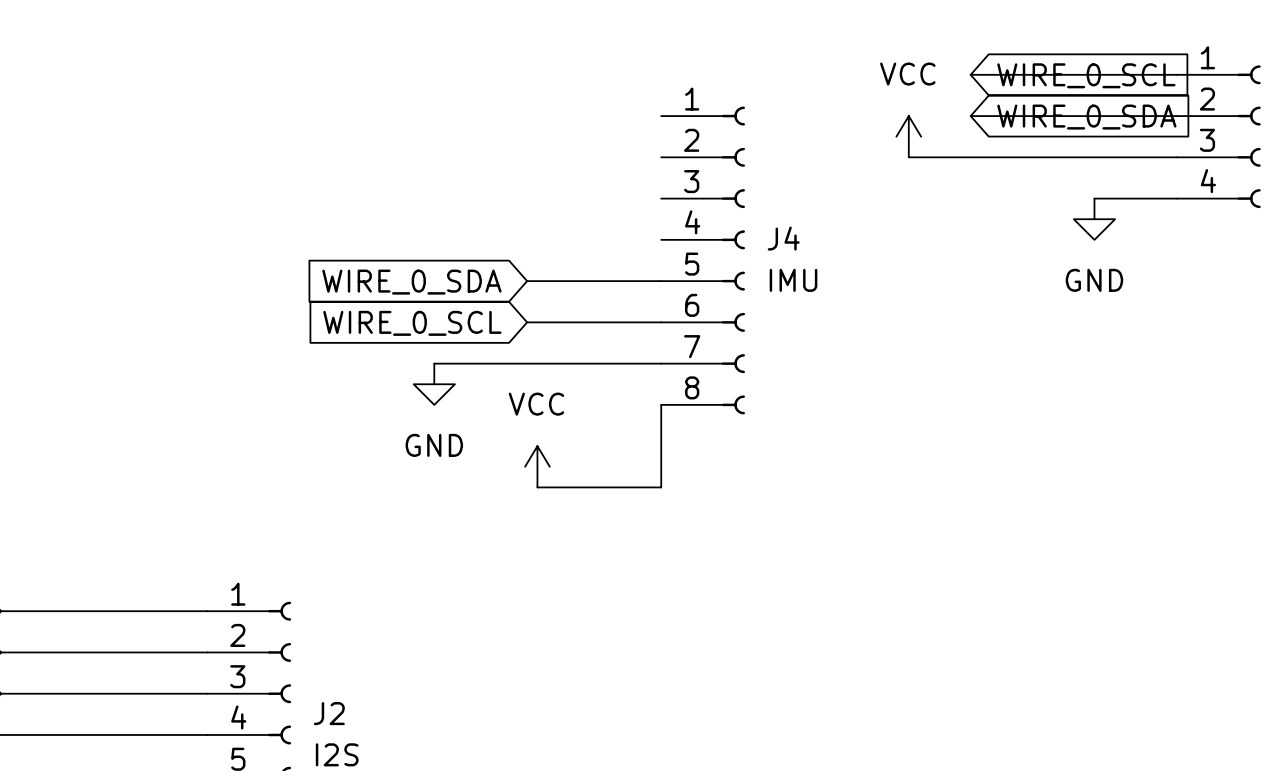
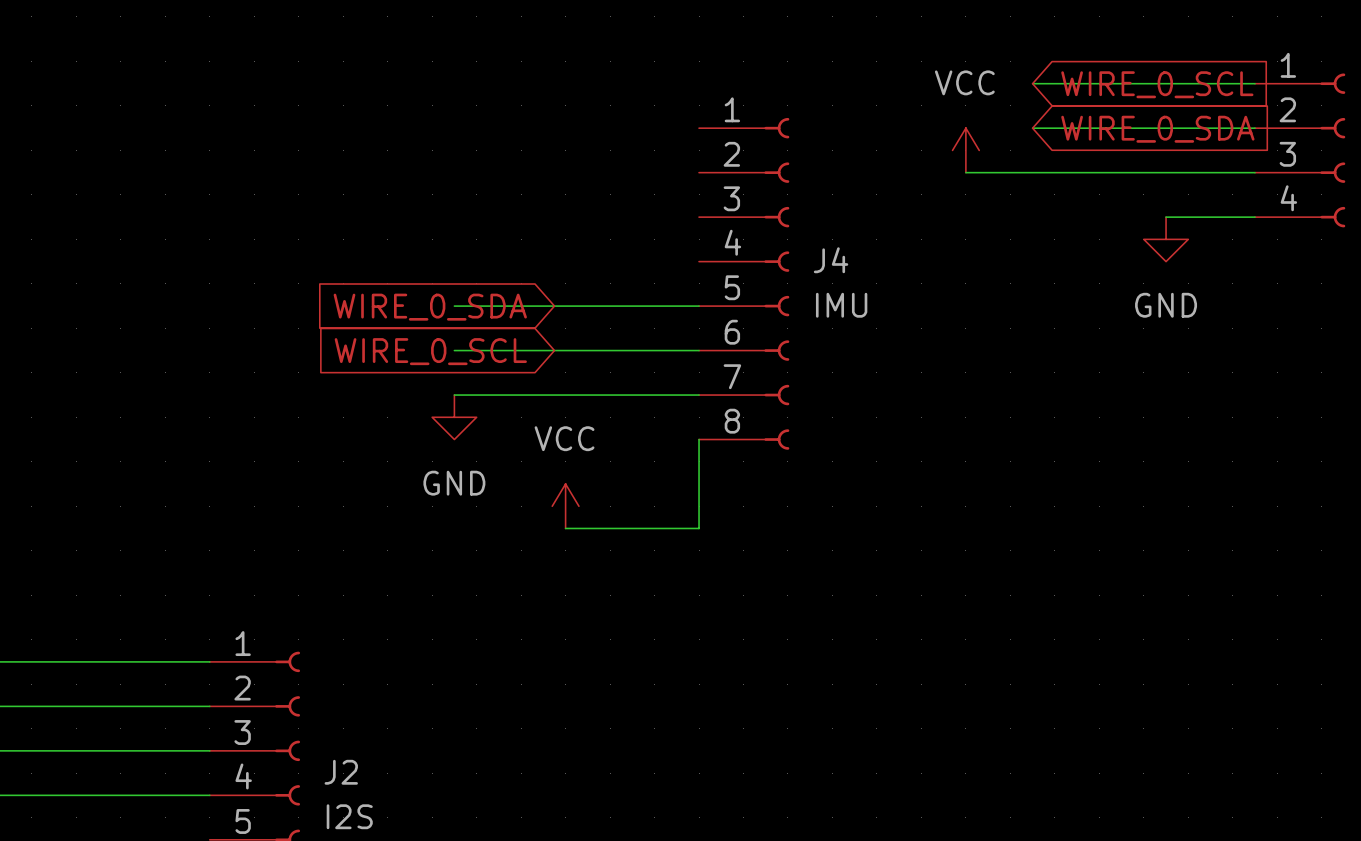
wire: none -> (454, 306) (554, 306)
wire: none -> (454, 350) (554, 350)

